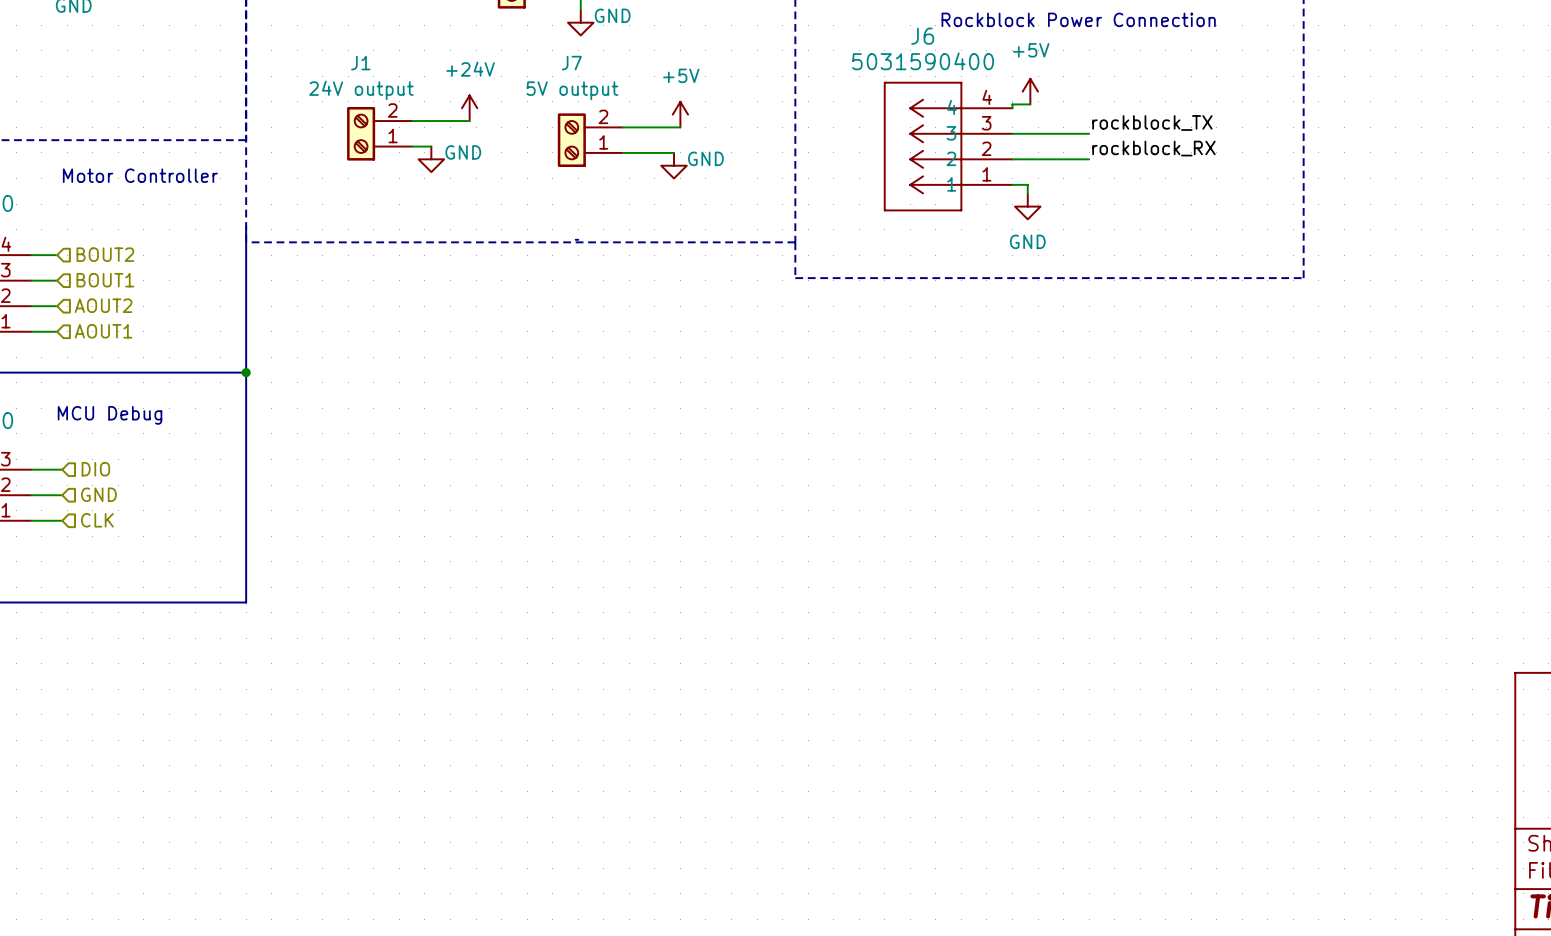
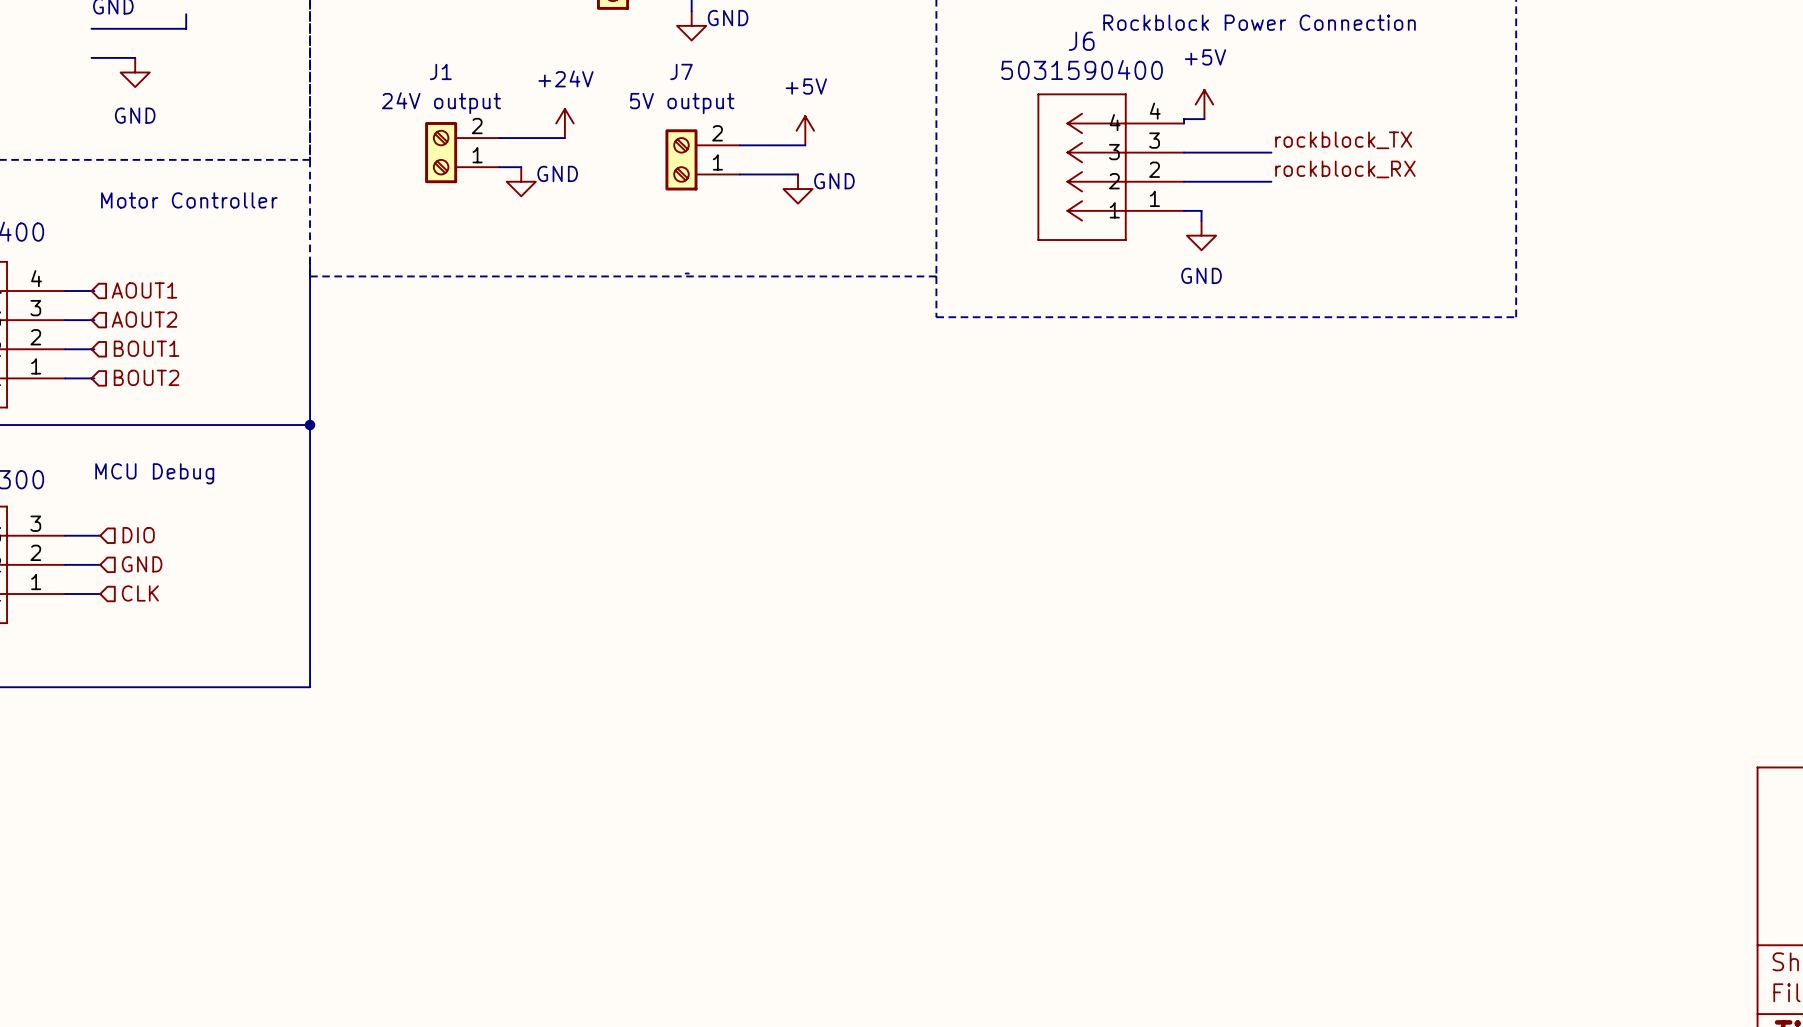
wire: none -> (186, 14) (186, 28) (91, 28)
wire: none -> (91, 57) (135, 57)
power symbol: none -> GND (135, 72)
hierarchical label position: BOUT2 (105, 254) -> BOUT2 (146, 377)
hierarchical label position: BOUT1 (105, 280) -> BOUT1 (146, 348)
hierarchical label position: AOUT2 (103, 305) -> AOUT2 (144, 319)
hierarchical label position: AOUT1 (103, 331) -> AOUT1 (144, 290)

